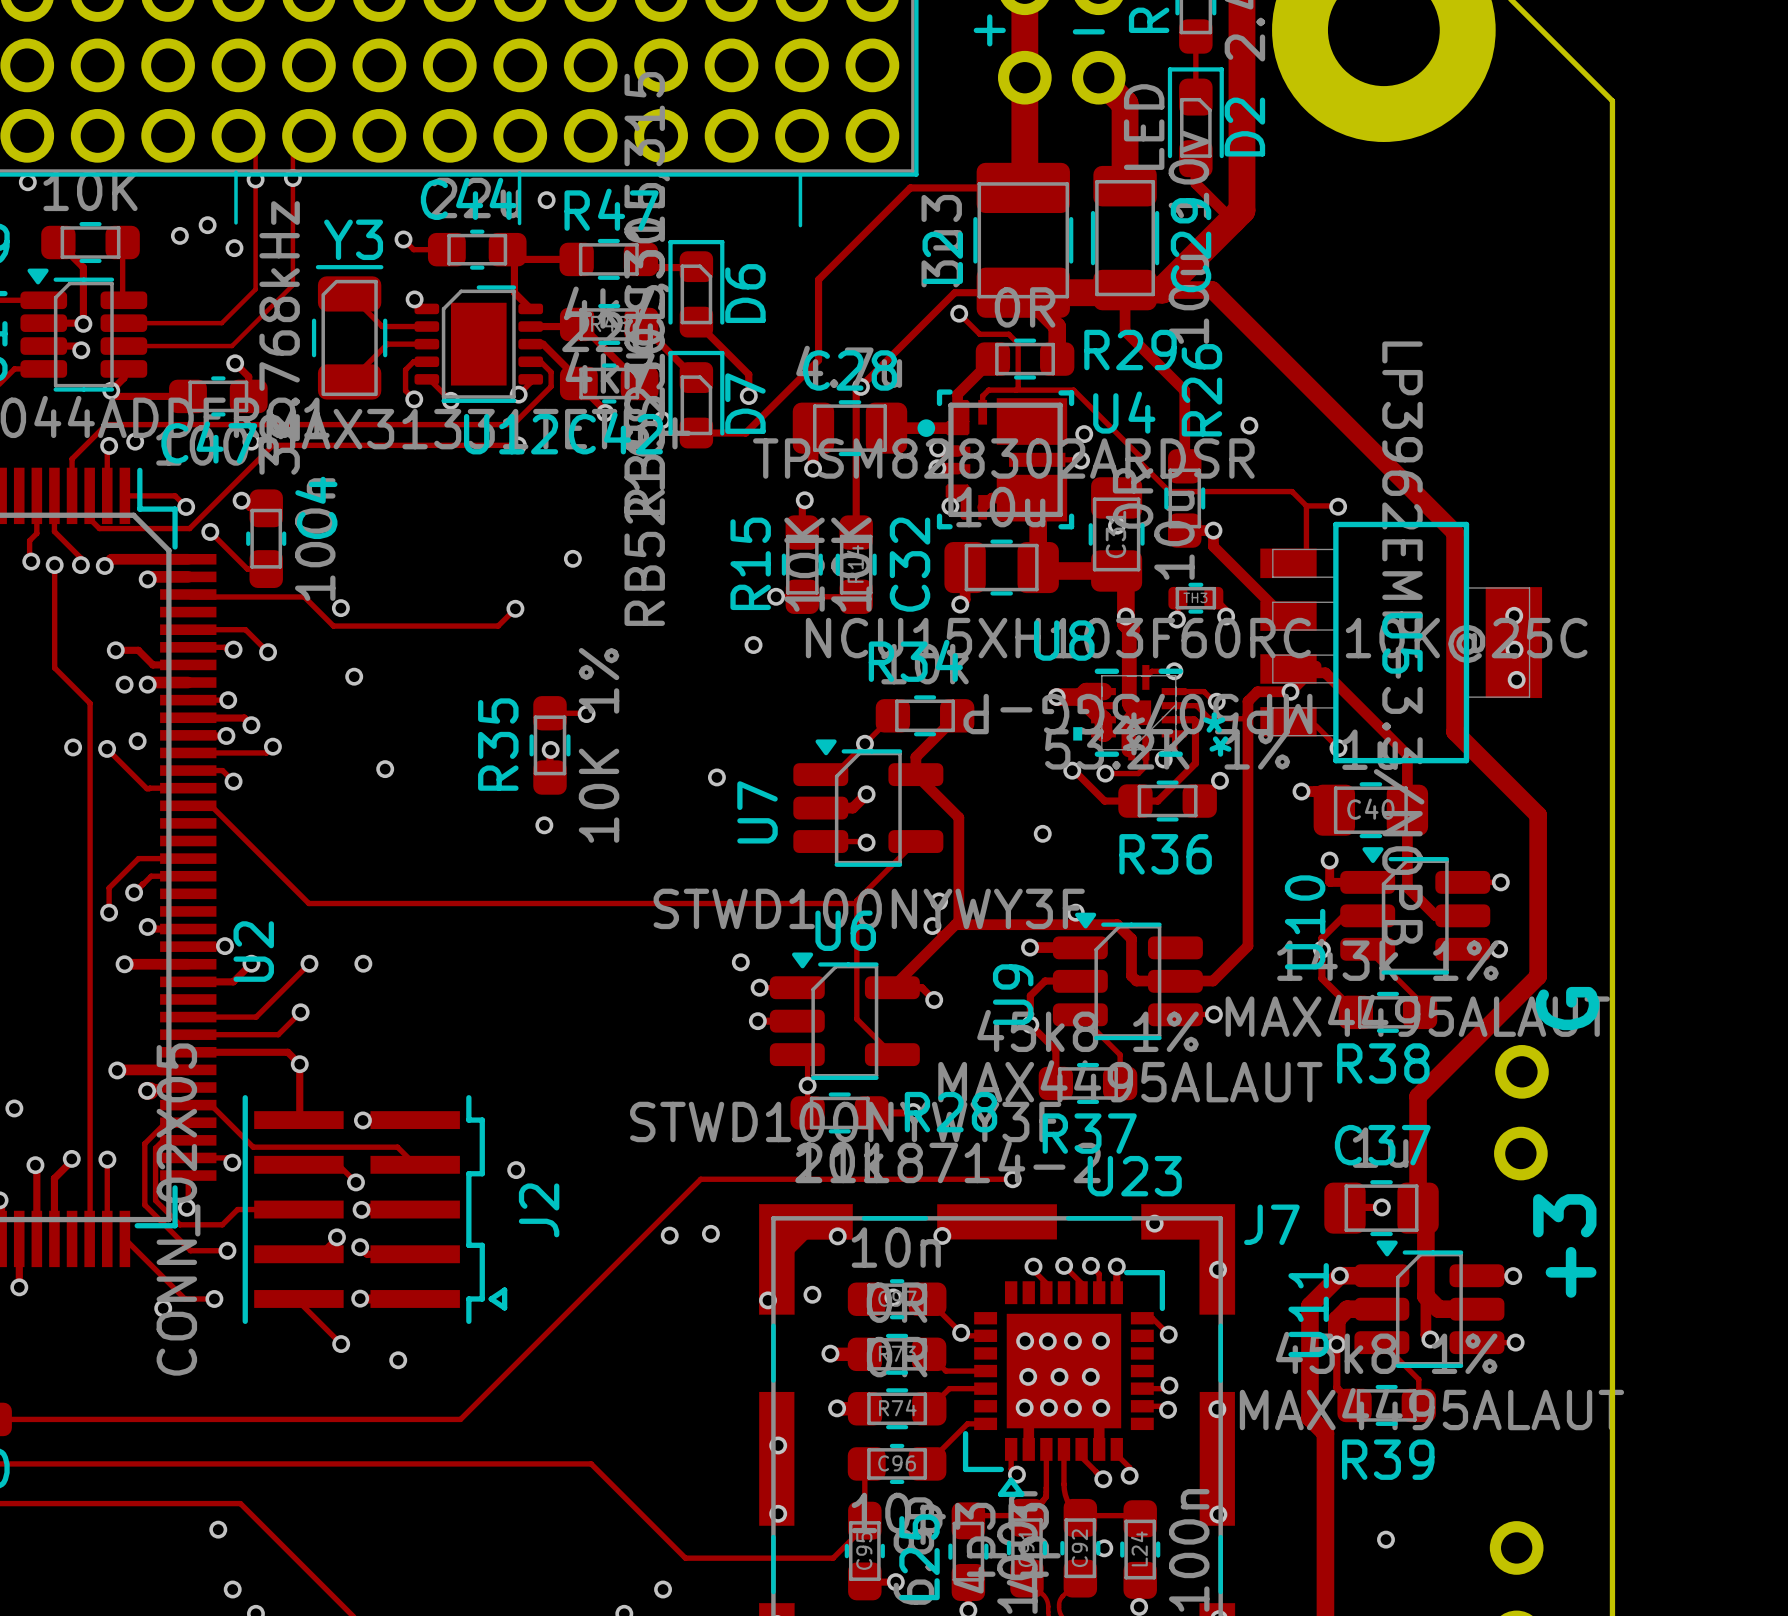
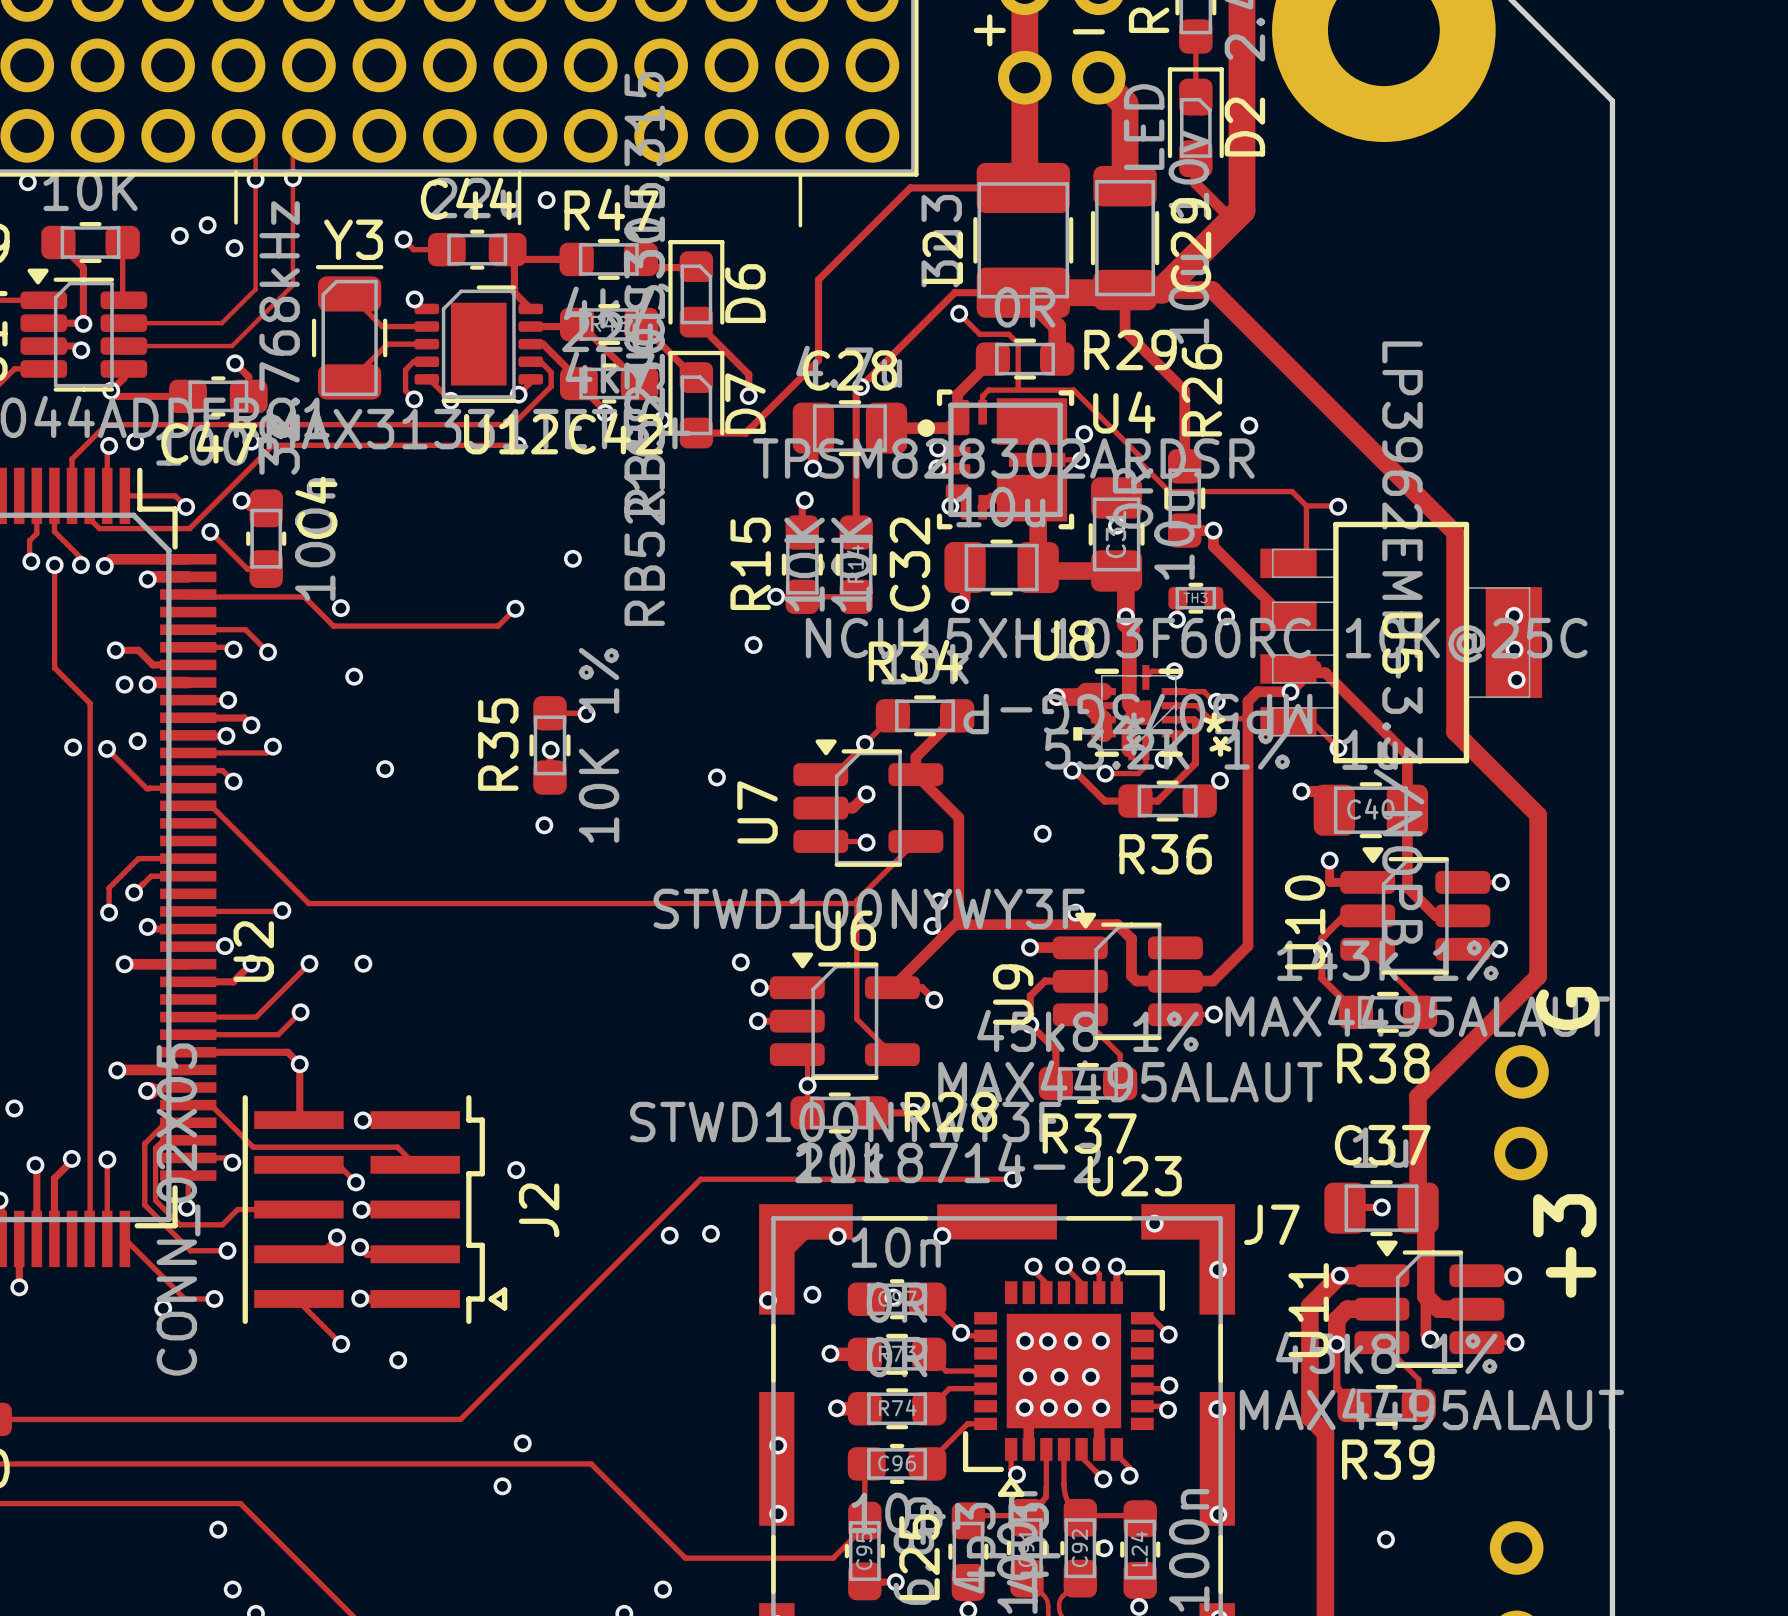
track: none -> (282, 910) (188, 911)
via: none -> (282, 910)
via: none -> (522, 1443)
via: none -> (502, 1486)

